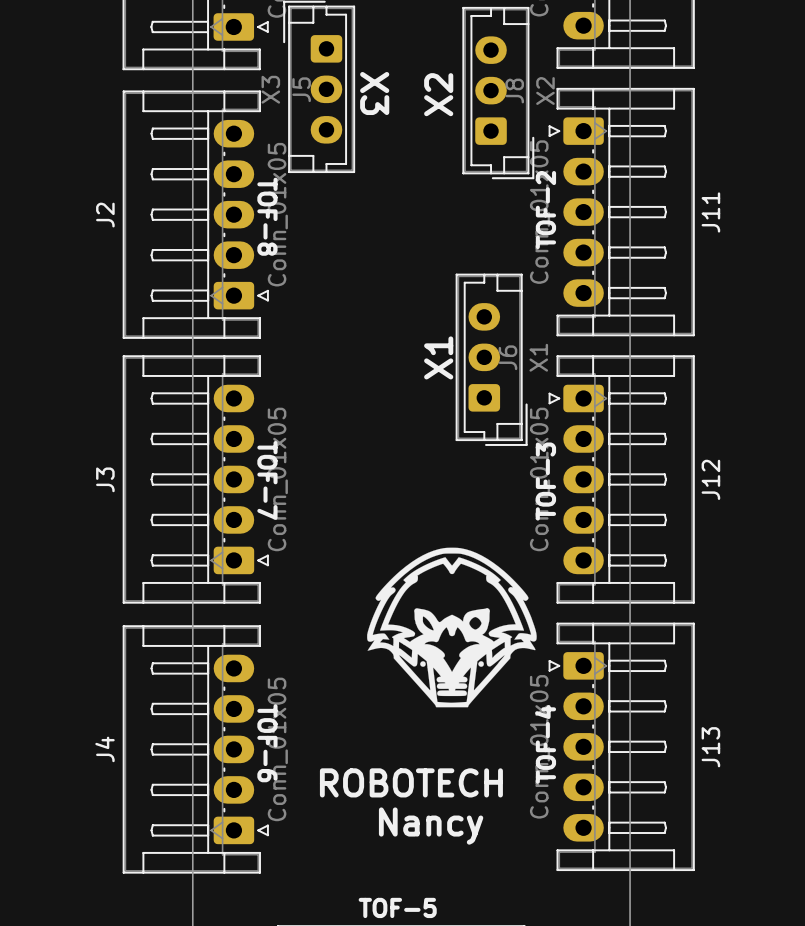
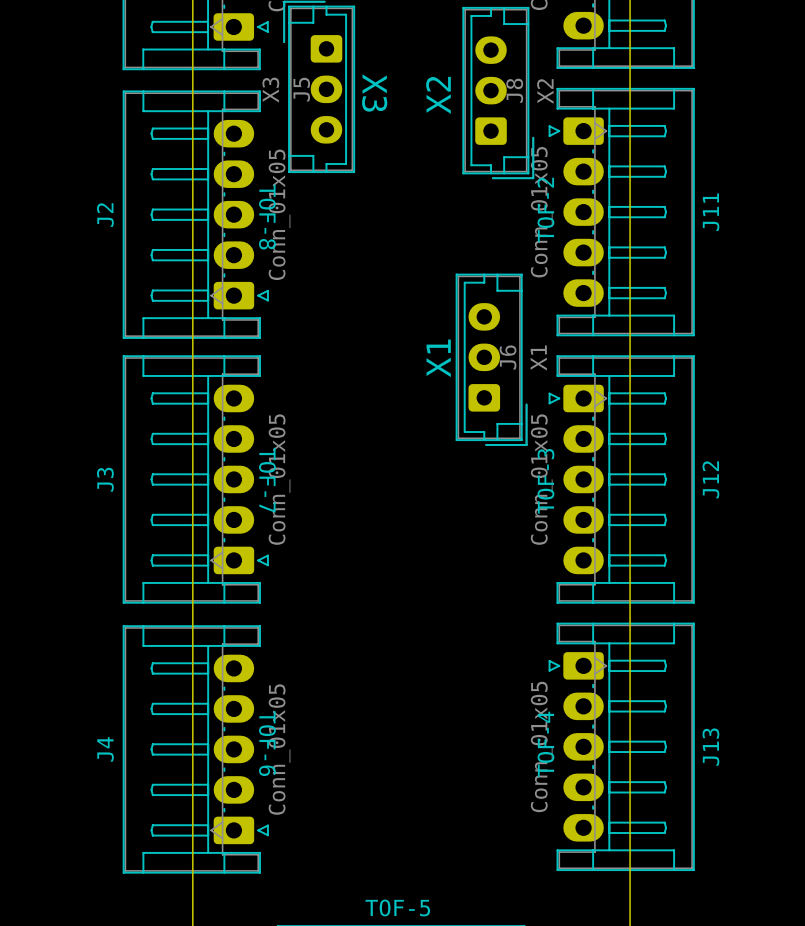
drawing: [367, 547, 537, 708] -> none
text: ROBOTECH (411, 782) -> none
text: Nancy (431, 826) -> none

